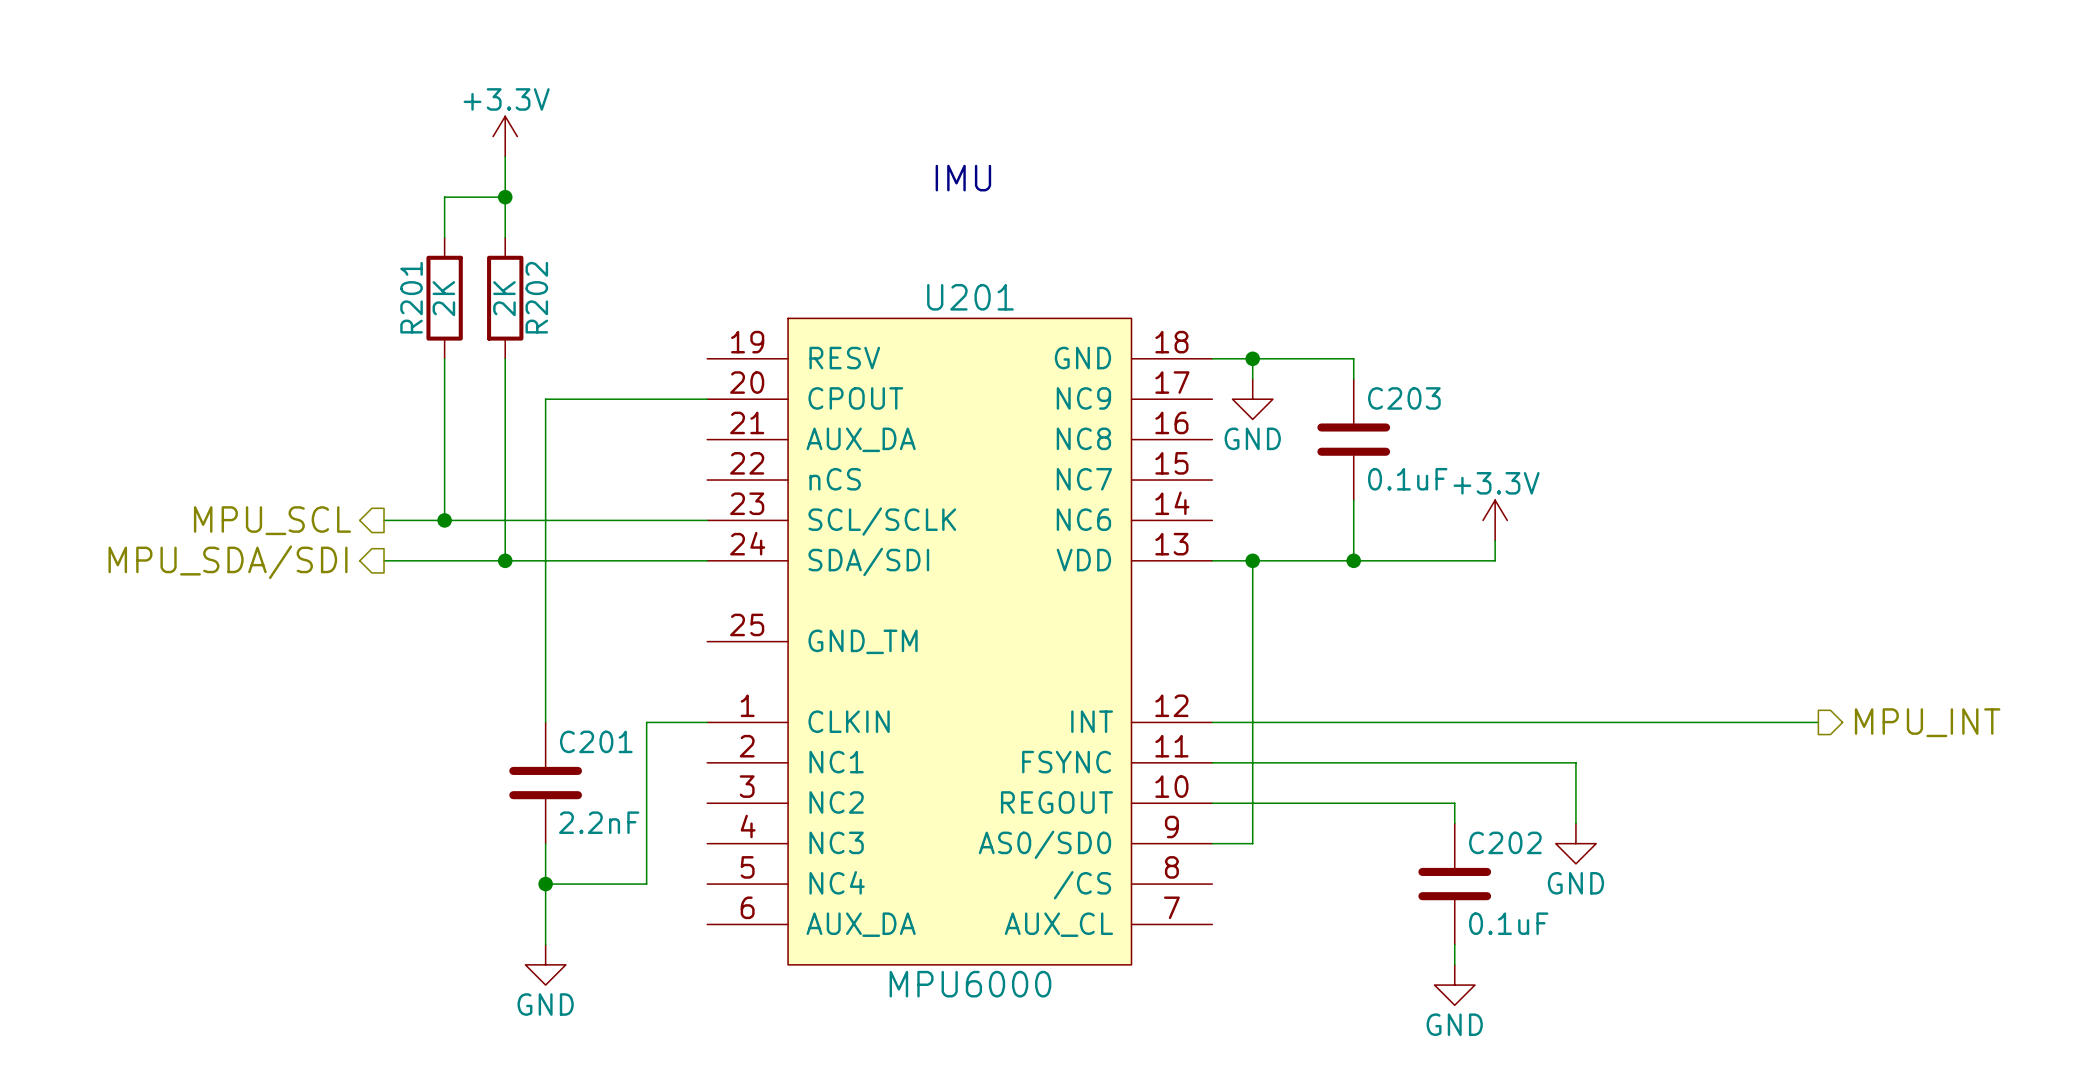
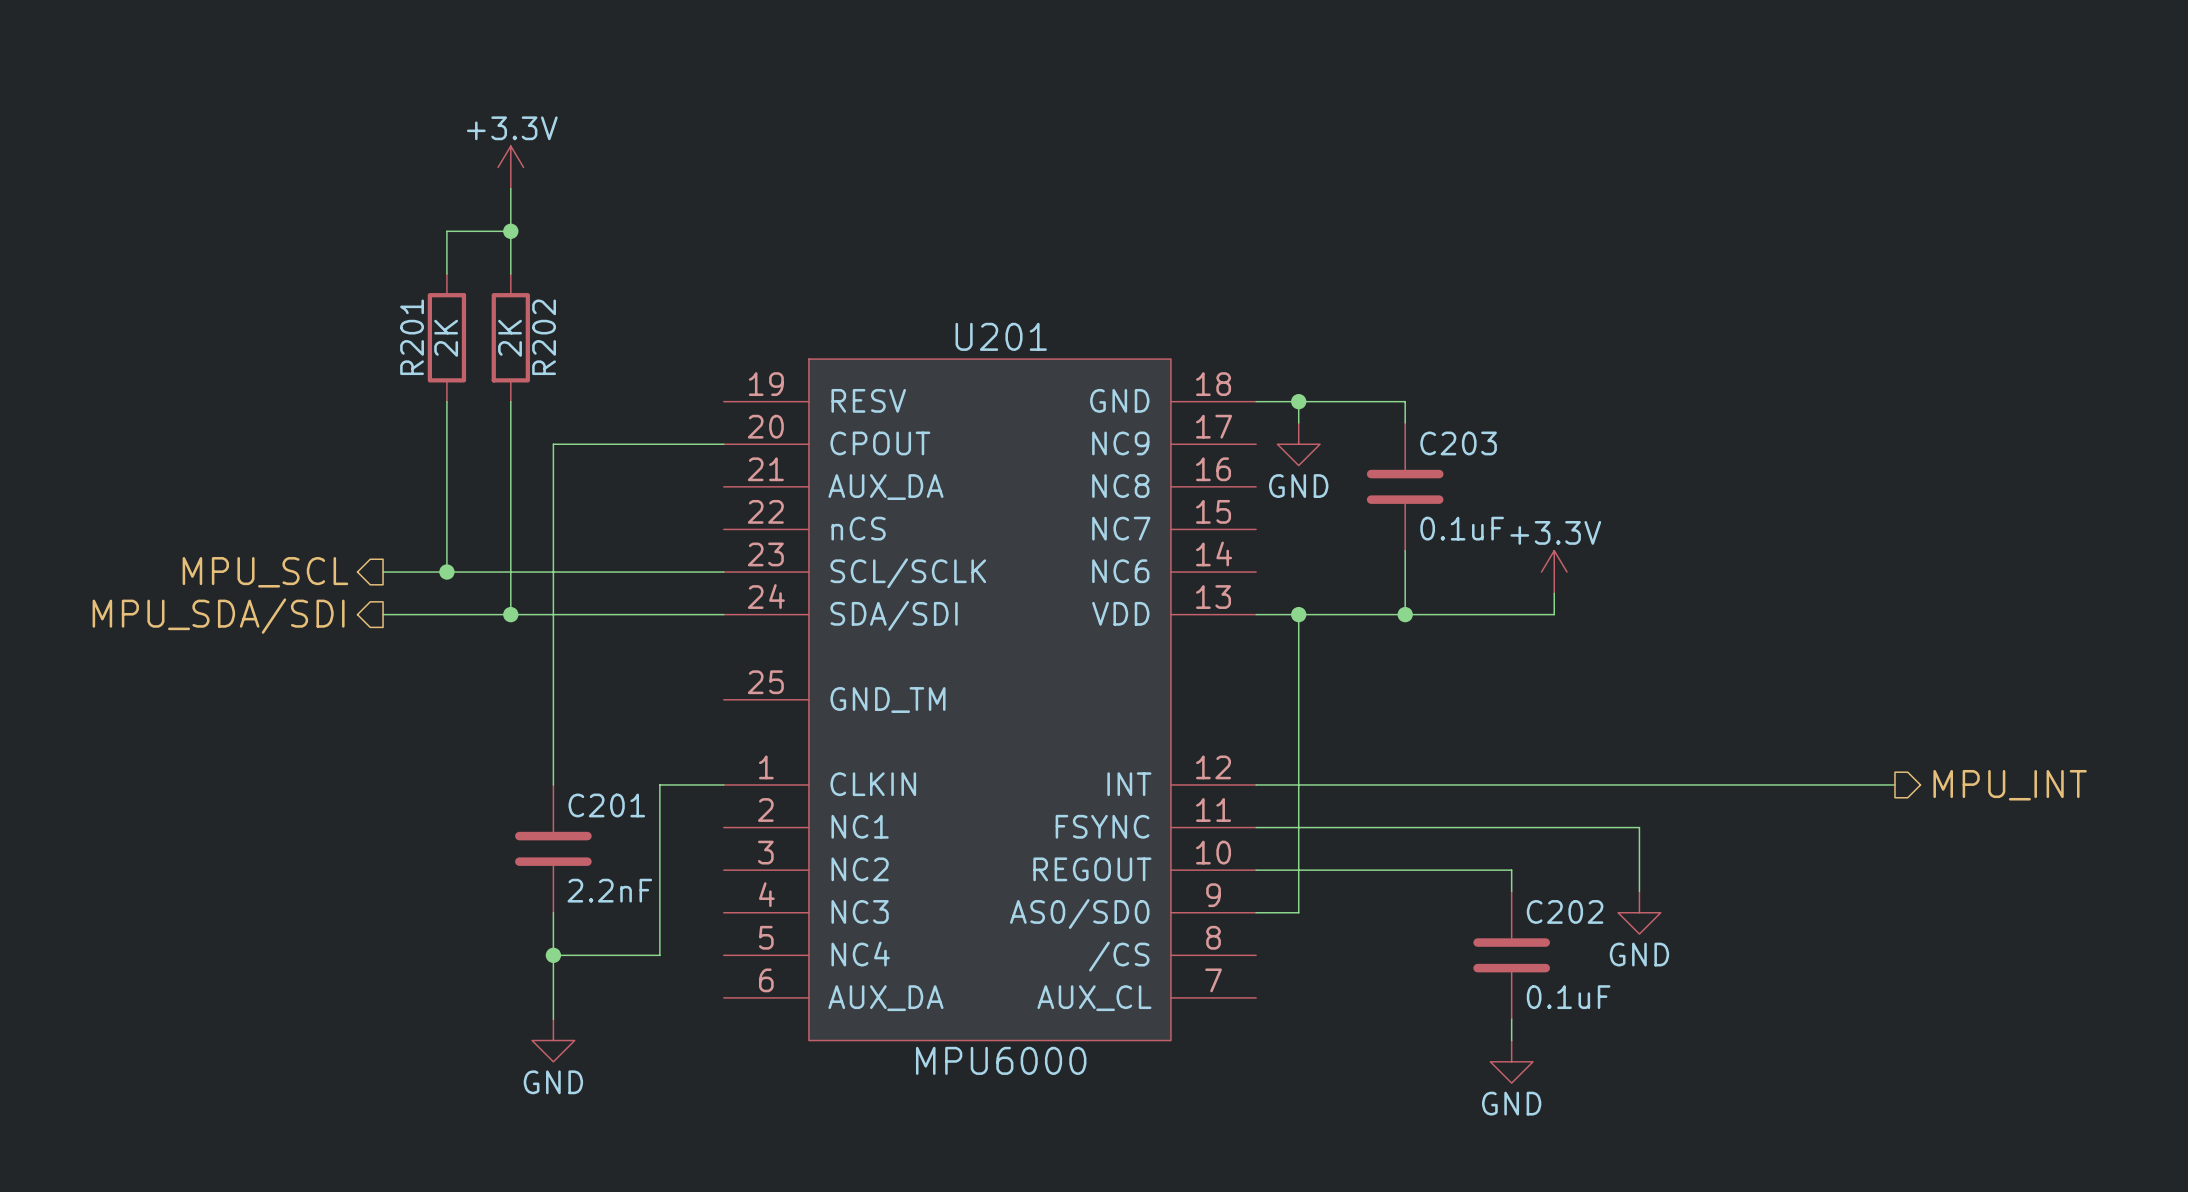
text: IMU (963, 178) -> none

